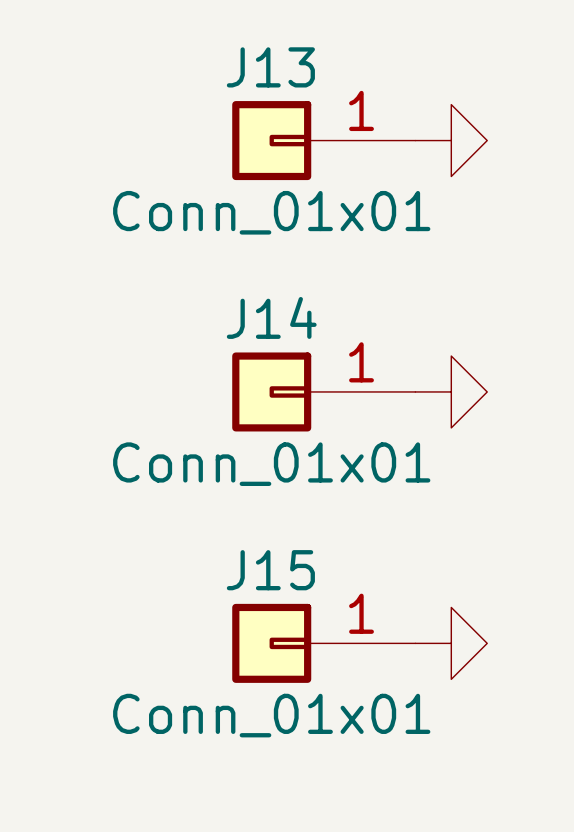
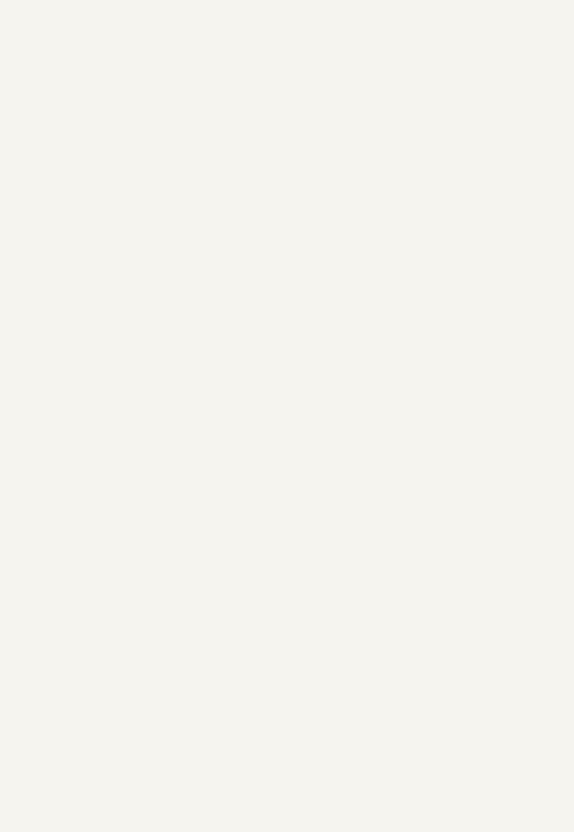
J13: Conn_01x01 (323, 140) -> none
power symbol: (451, 140) -> none
J14: Conn_01x01 (323, 391) -> none
power symbol: (451, 391) -> none
J15: Conn_01x01 (323, 643) -> none
power symbol: (451, 643) -> none

